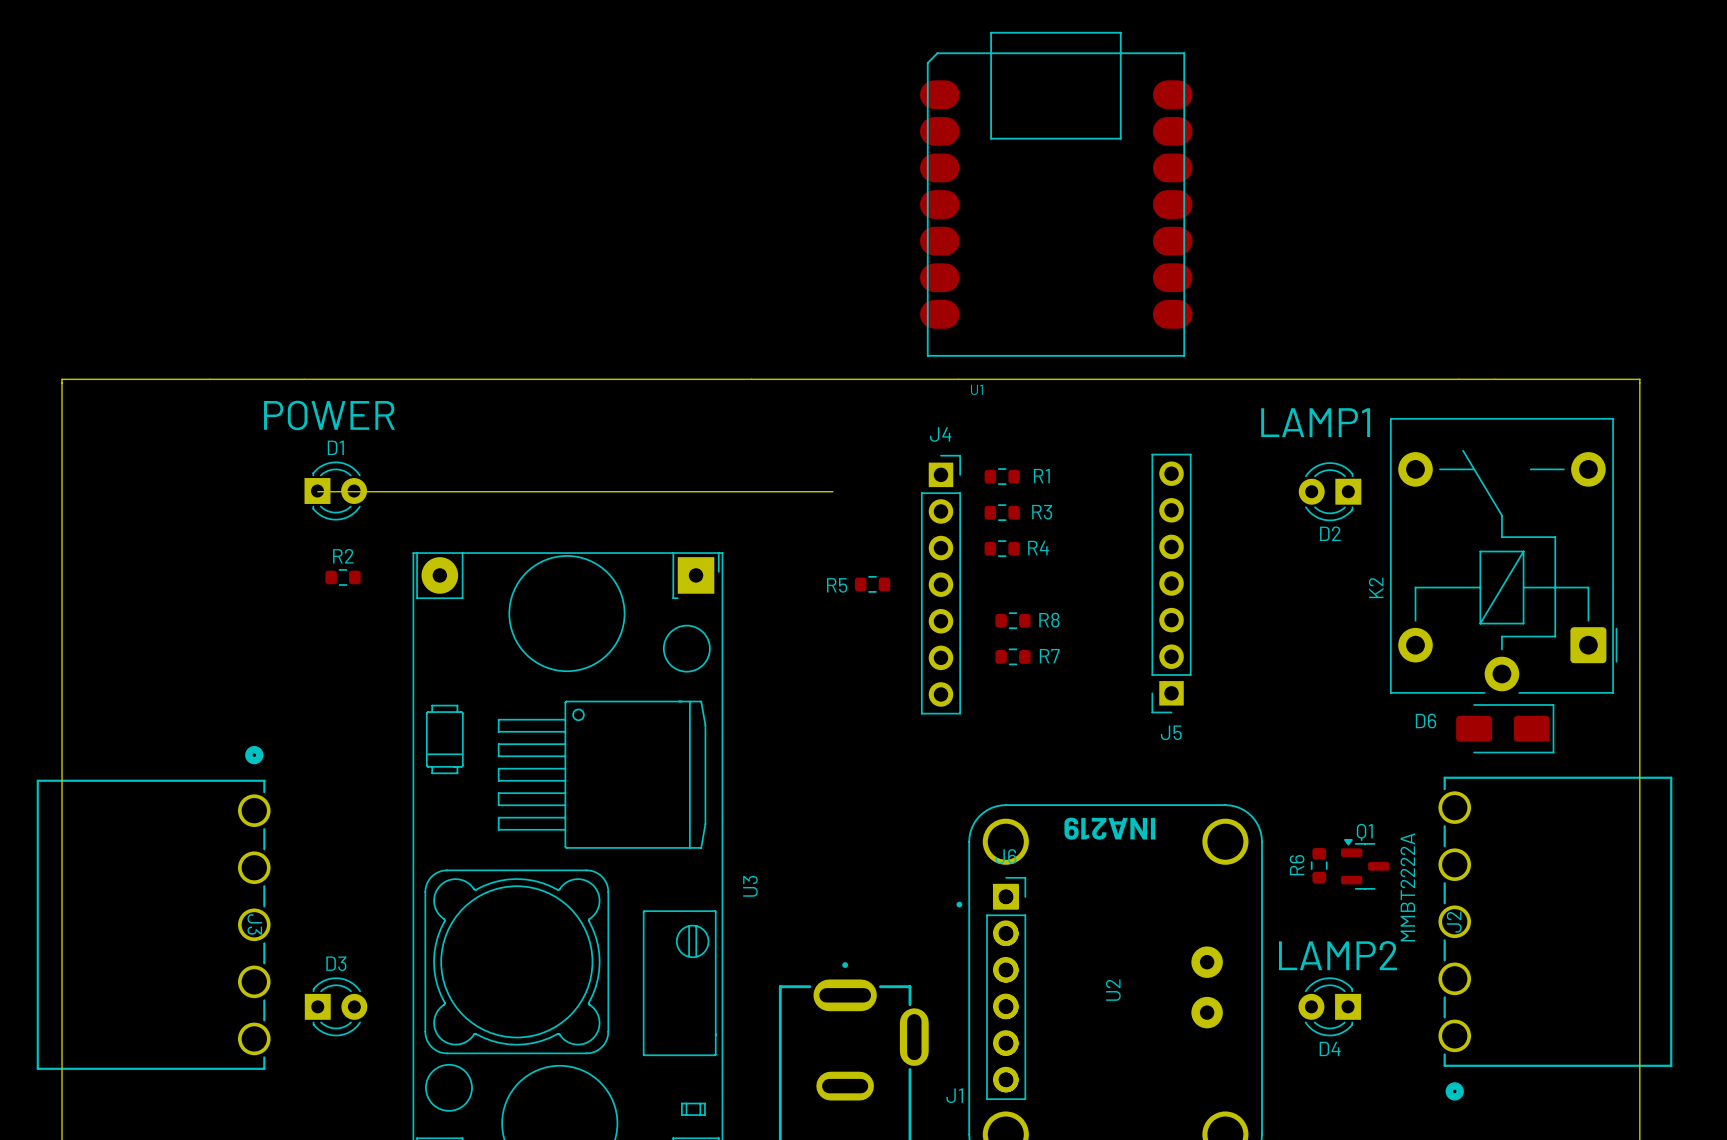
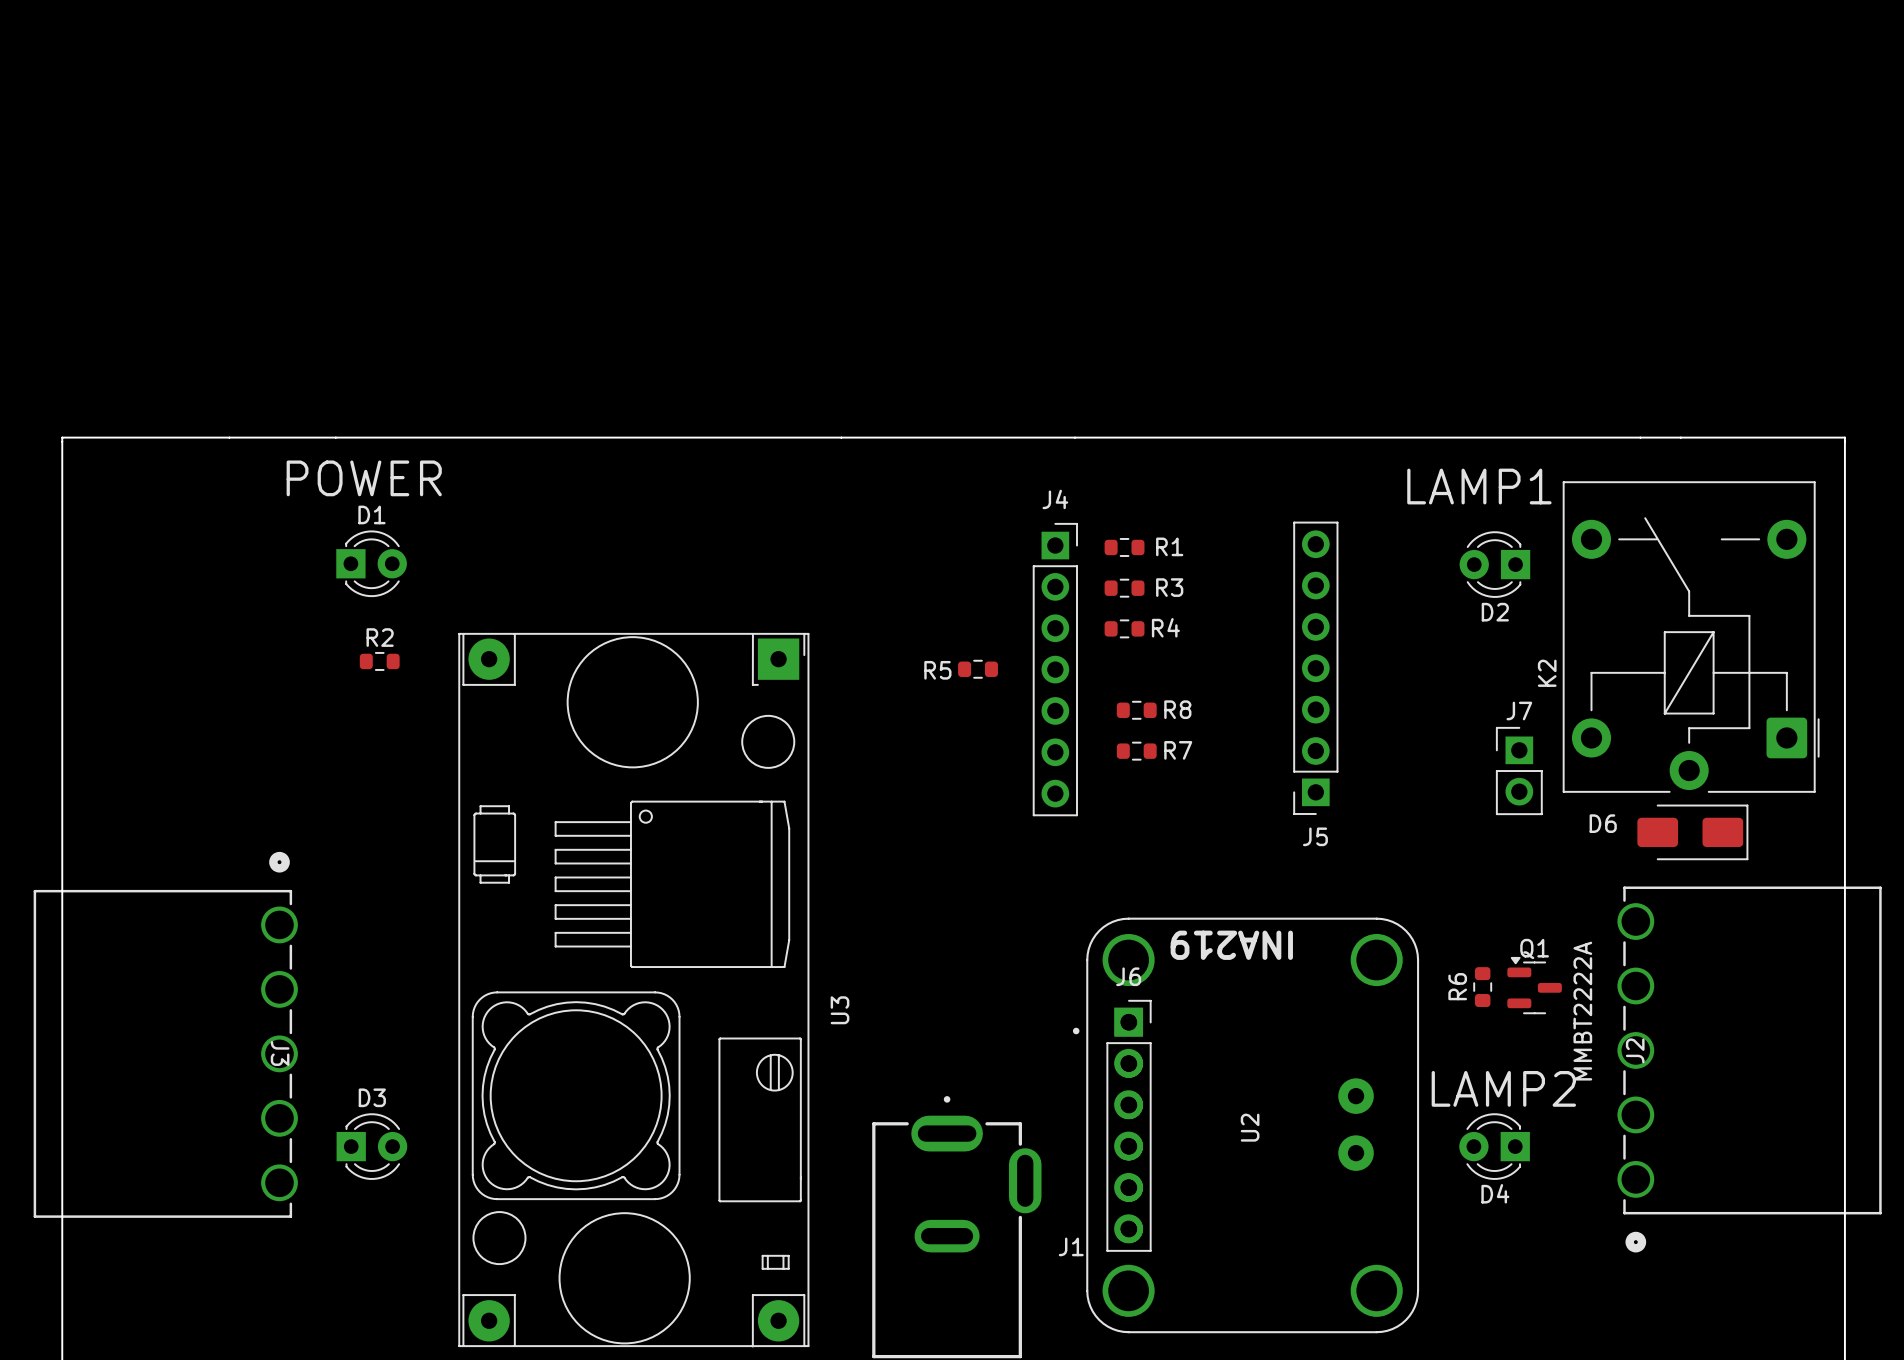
U1: (1056, 194) -> none
board edge: (317, 491) (832, 491) -> none
J7: none -> (1519, 771)

